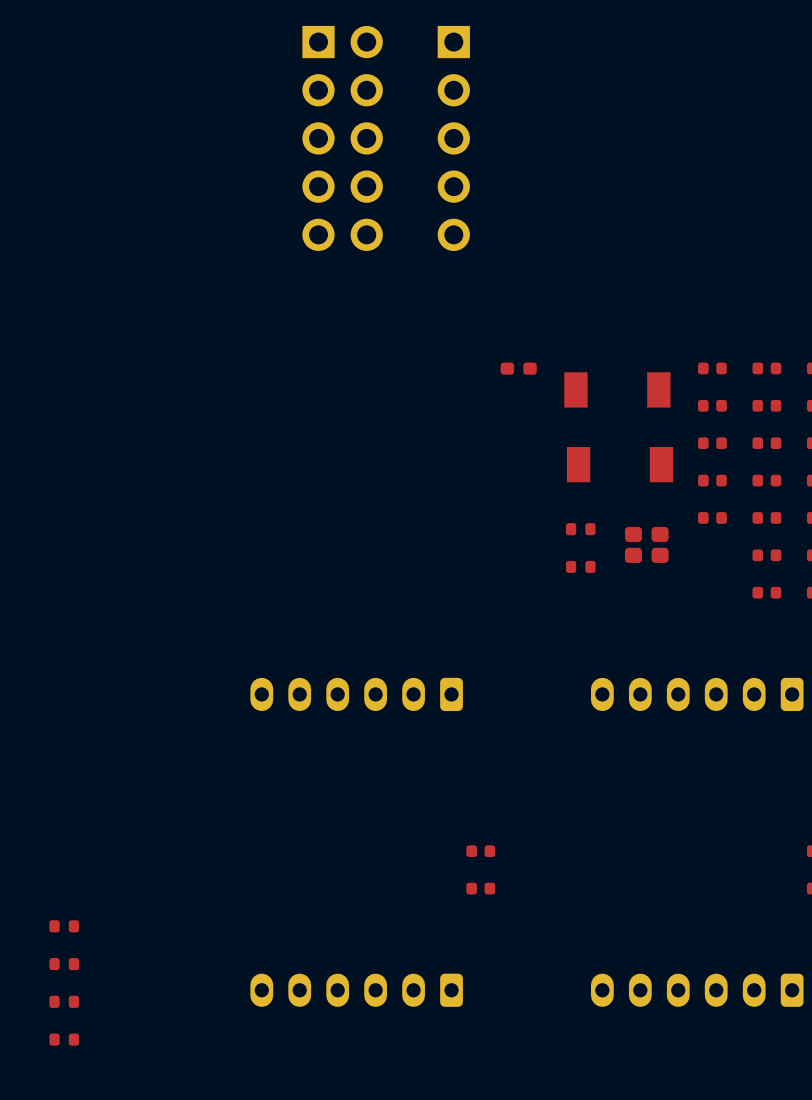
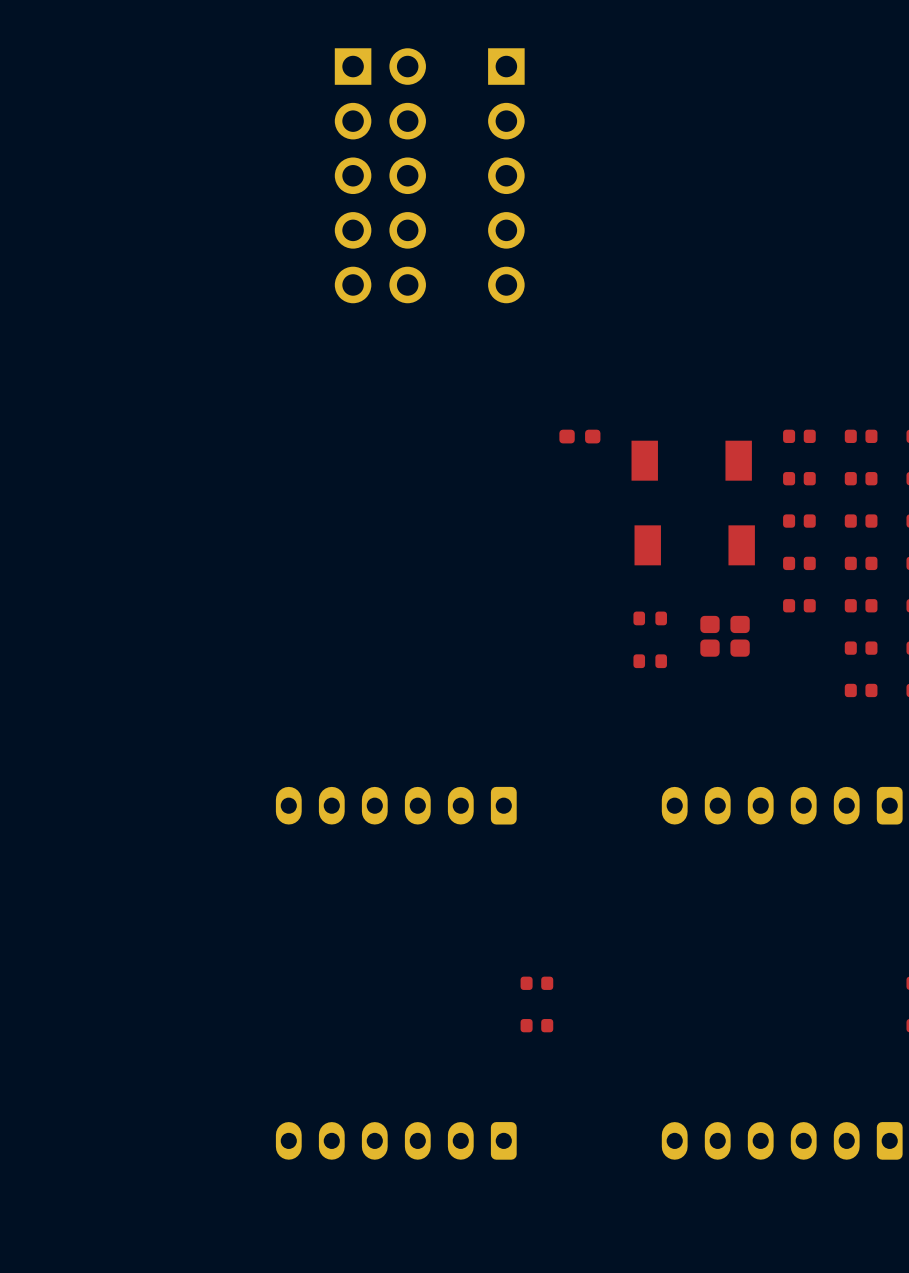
part: (64, 926) -> none
part: (64, 964) -> none
part: (64, 1001) -> none
part: (64, 1039) -> none

